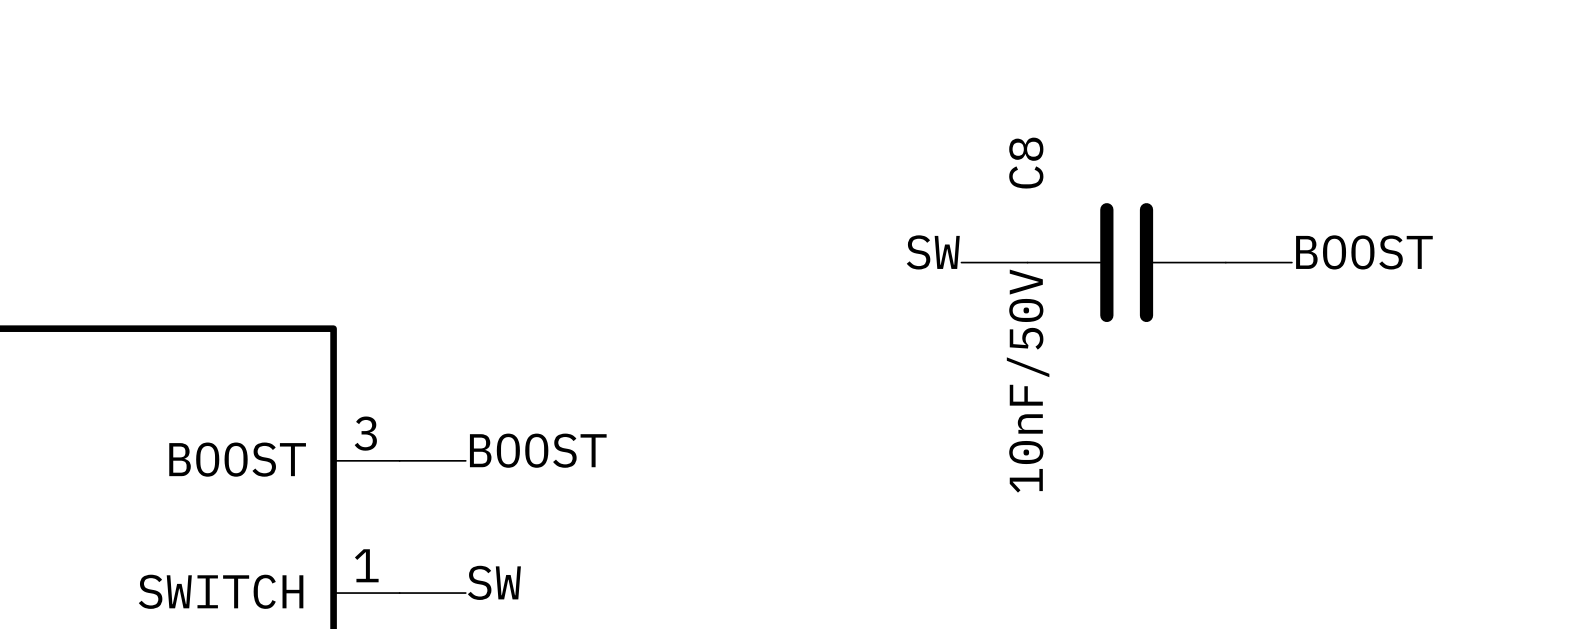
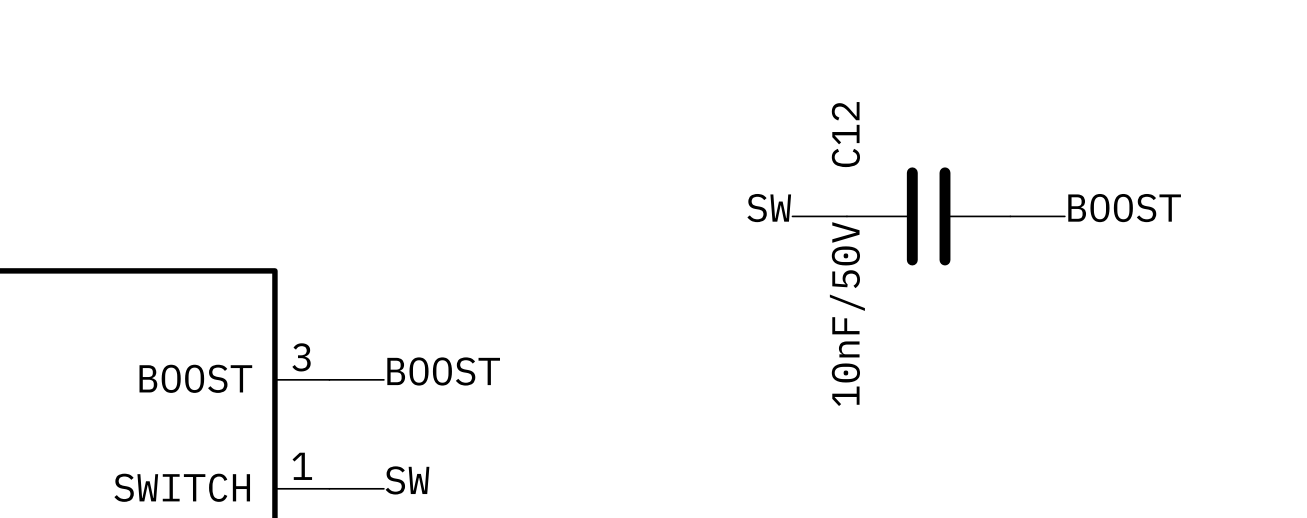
C8 name: C8 (1026, 163) -> C12 (845, 134)

